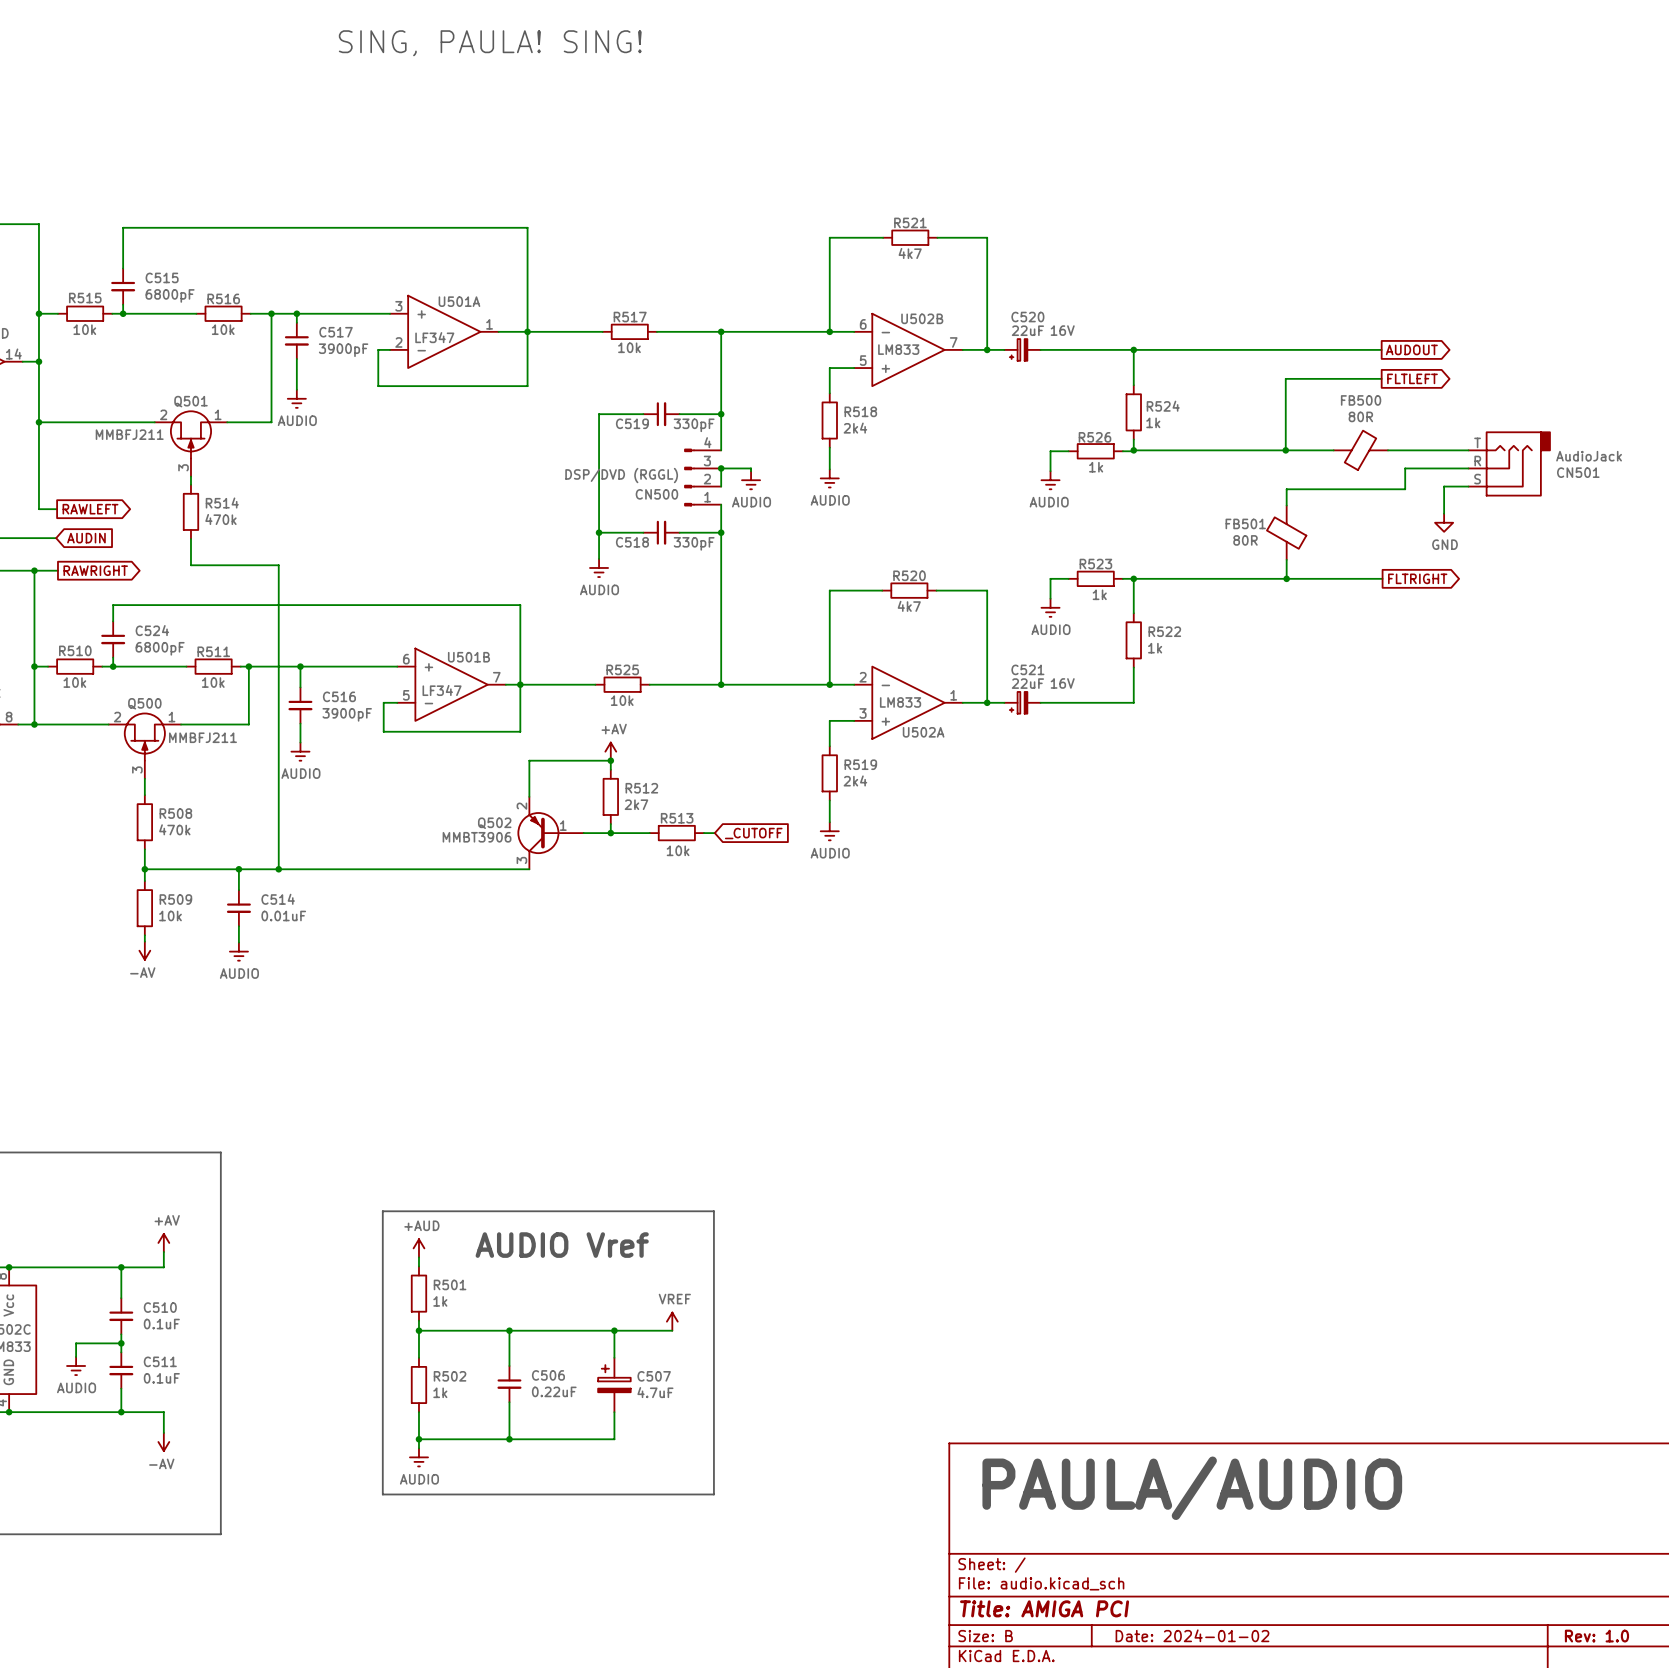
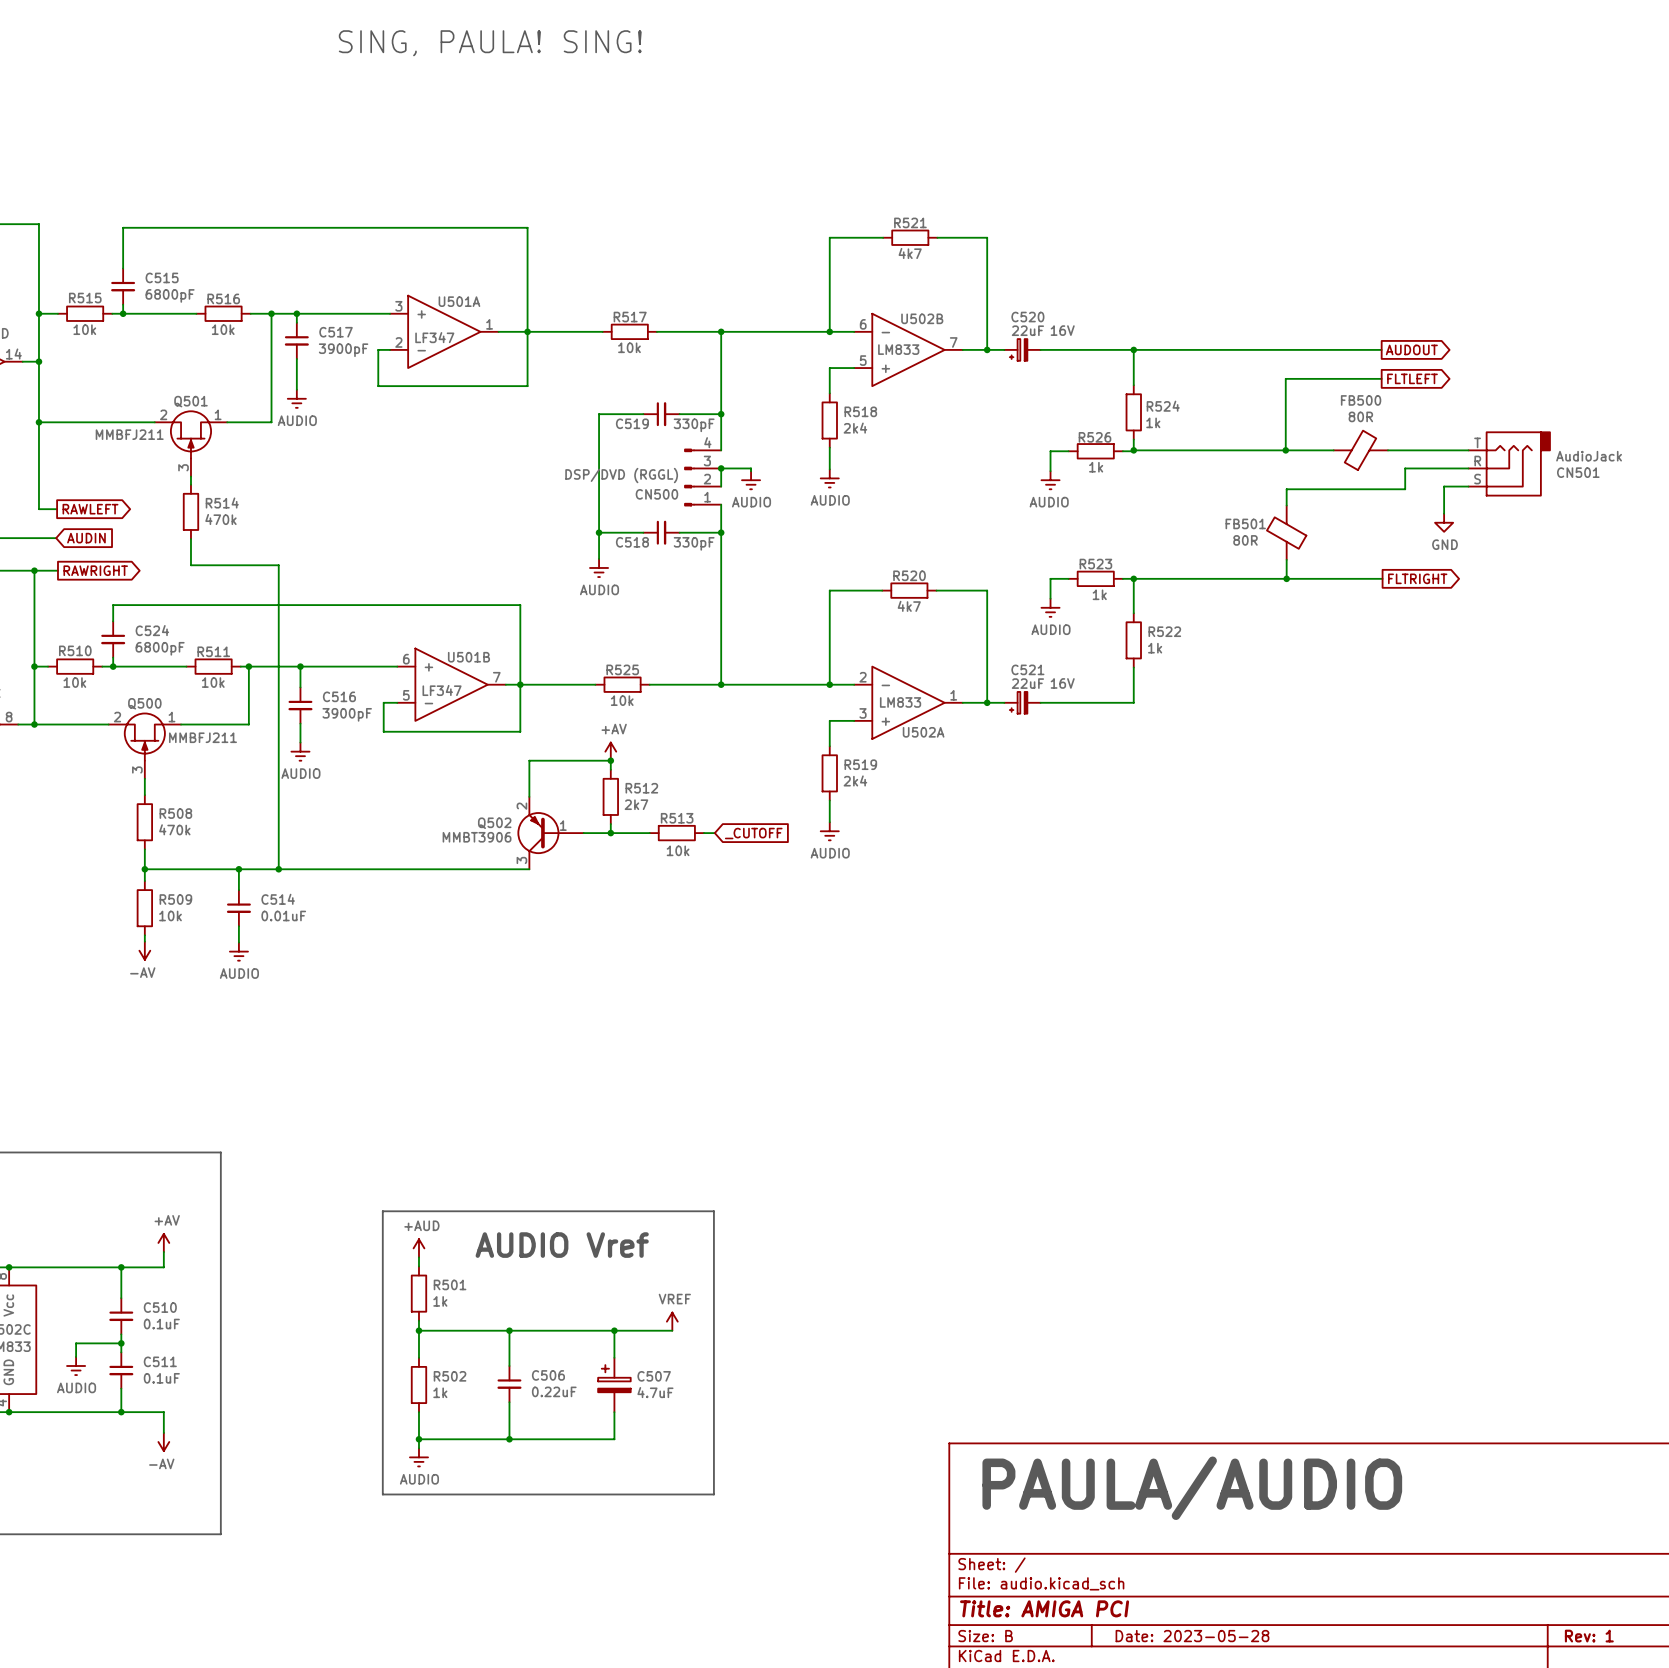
title block: Date: 2024-01-02 (1192, 1635) -> Date: 2023-05-28 (1192, 1636)
title block: Rev: 1.0 (1596, 1636) -> Rev: 1 (1589, 1636)

